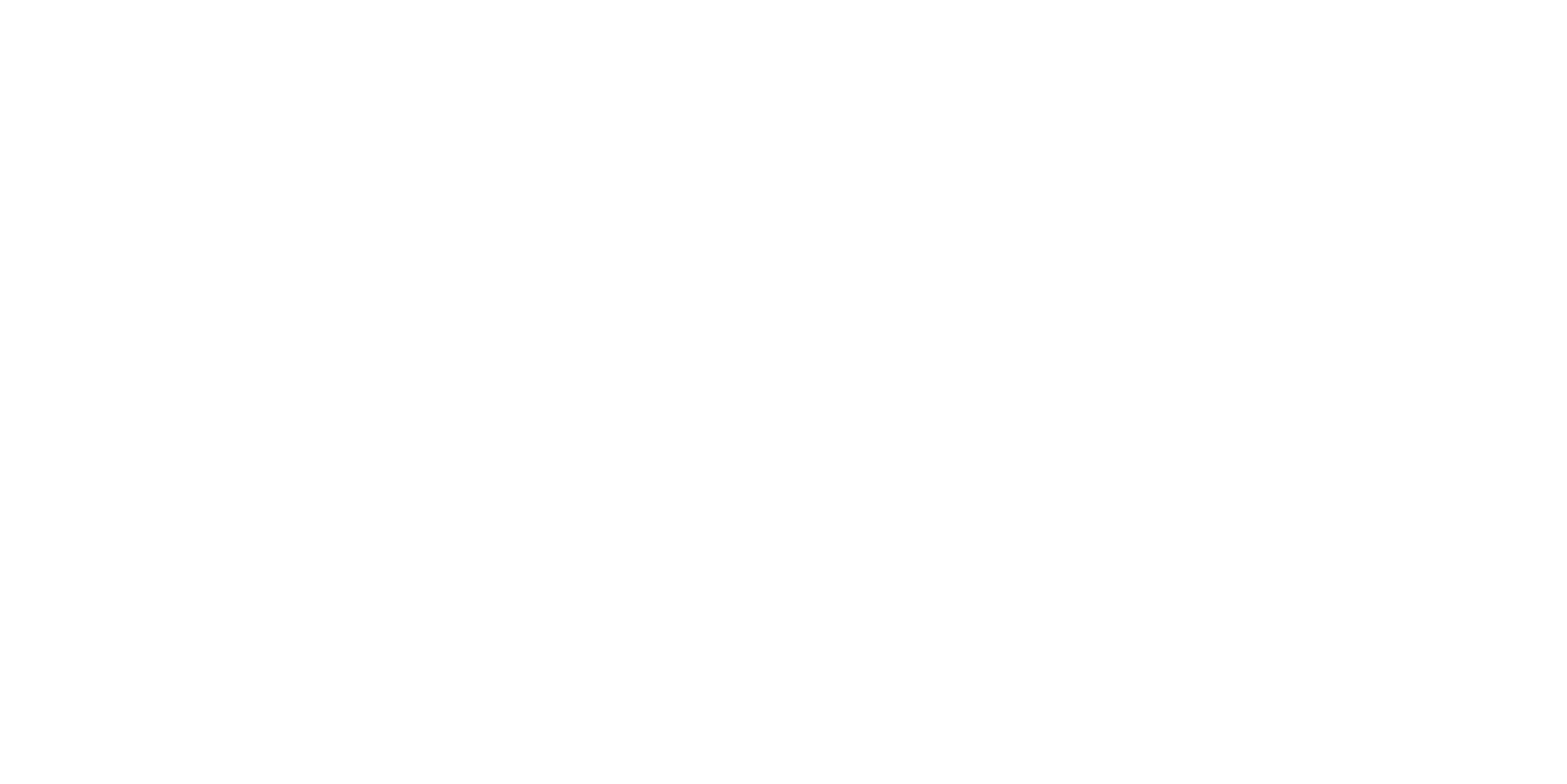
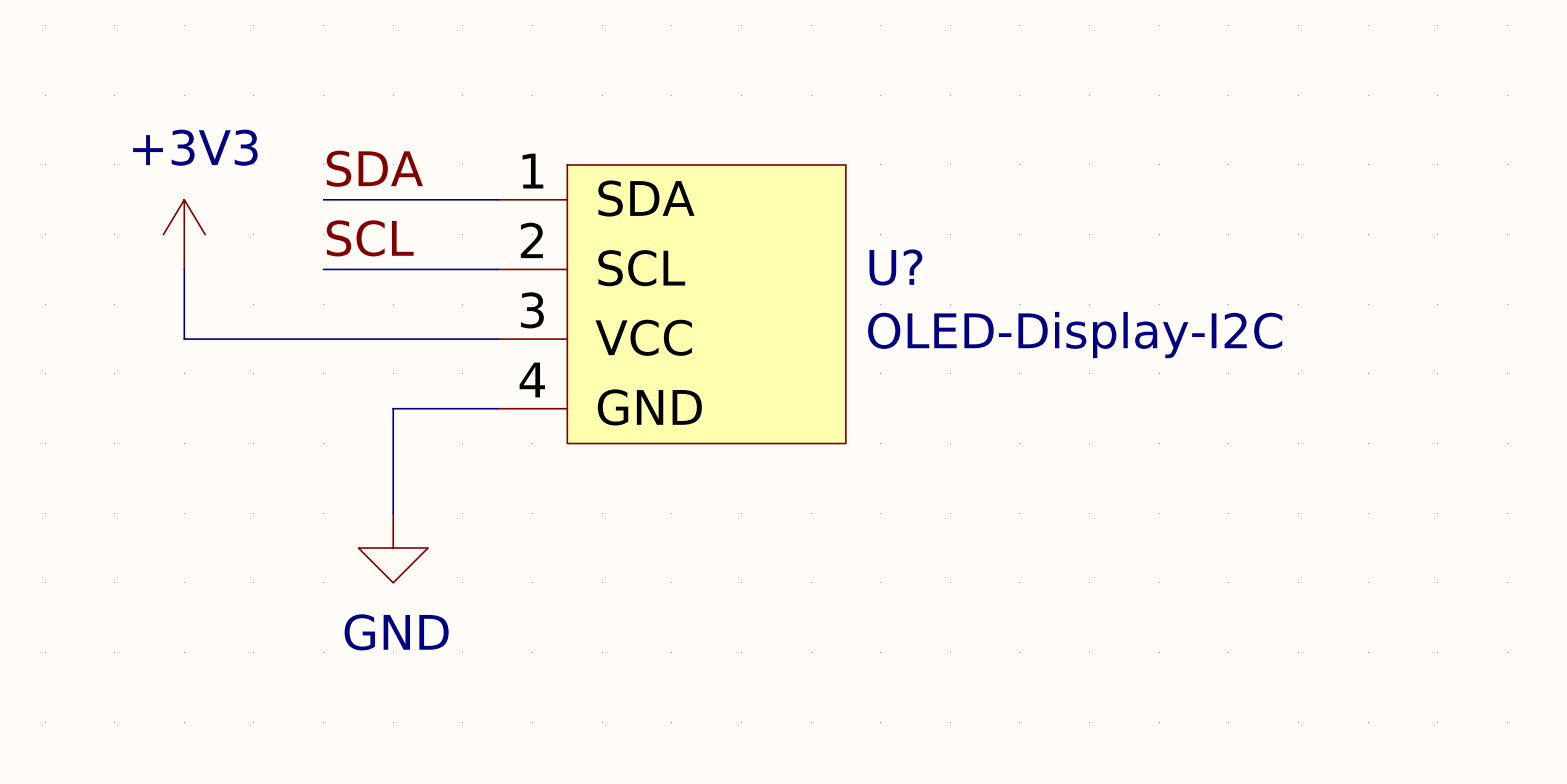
label: none -> SDA (374, 168)
wire: none -> (323, 199) (497, 199)
power symbol: none -> +3V3 (184, 234)
label: none -> SCL (370, 238)
wire: none -> (184, 269) (184, 339) (497, 339)
wire: none -> (323, 269) (497, 269)
U?: none -> OLED-Display-I2C (671, 304)
wire: none -> (497, 408) (393, 408) (393, 513)
power symbol: none -> GND (393, 547)

